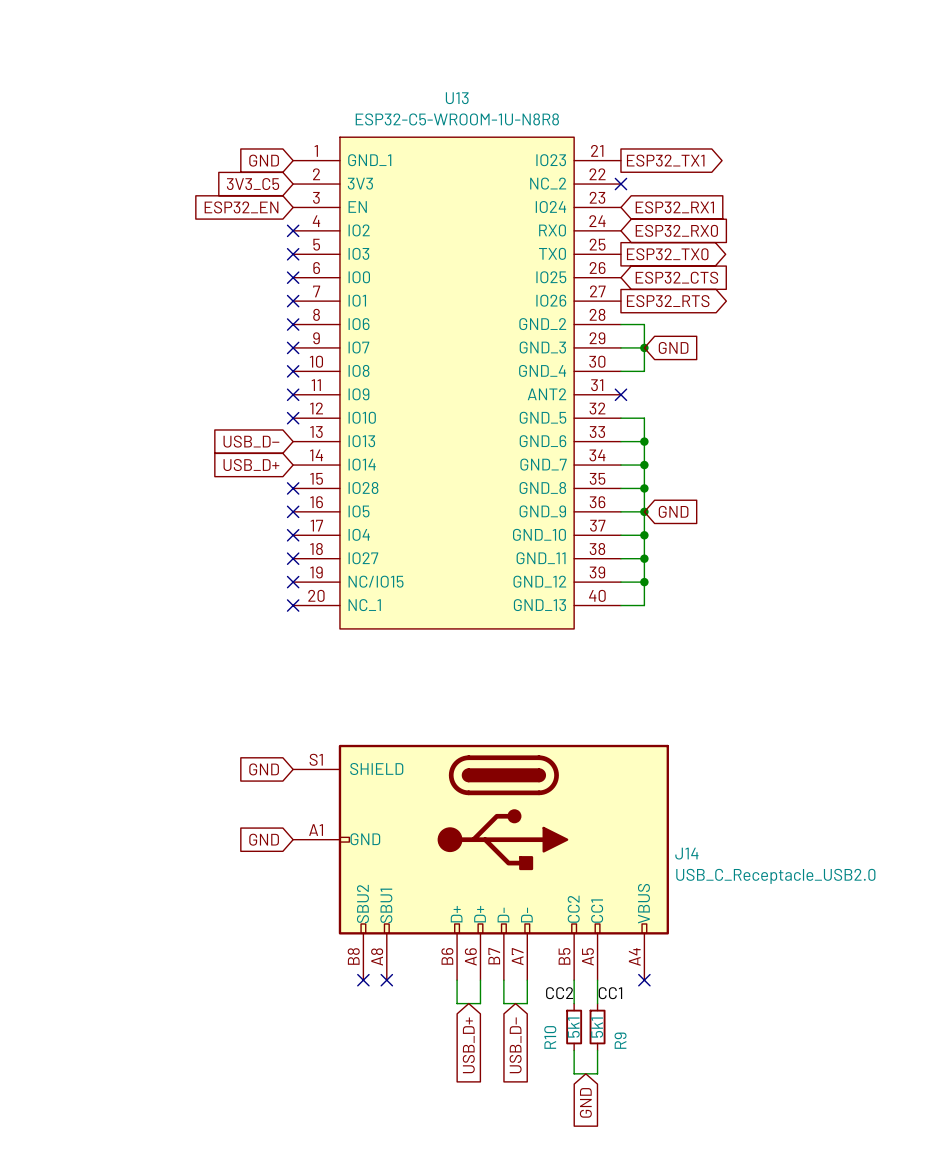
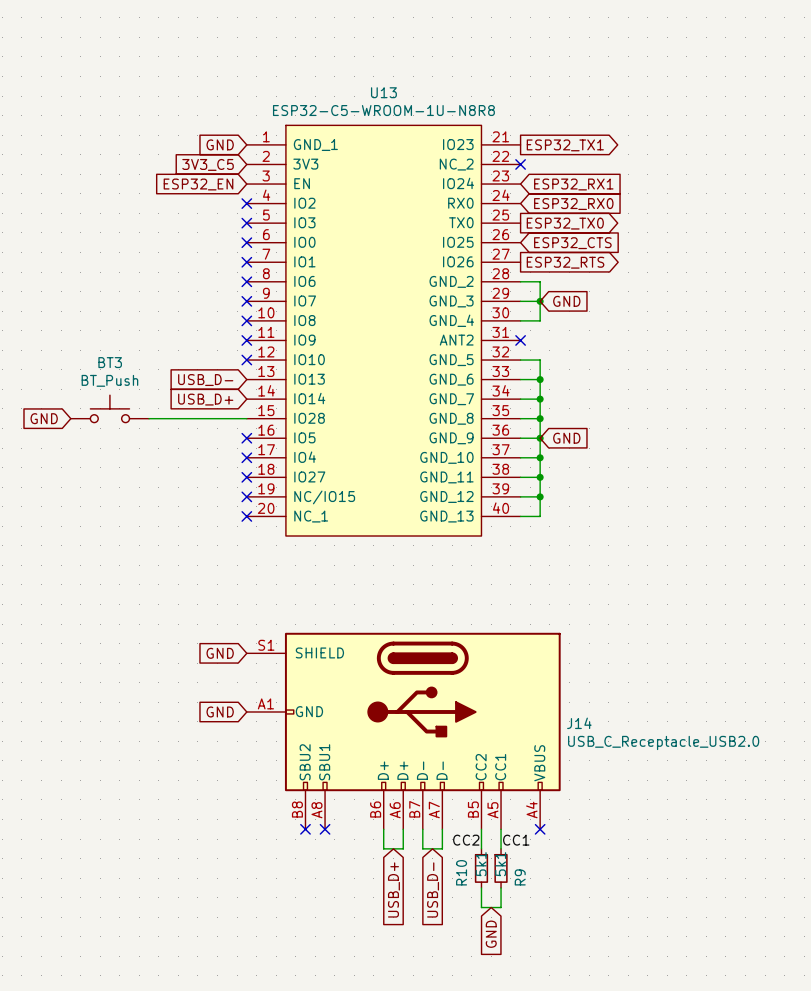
BT3: none -> BT_Push (109, 408)
global label: none -> GND (44, 418)
wire: none -> (149, 418) (246, 418)
no-connect mark: (293, 488) -> none

